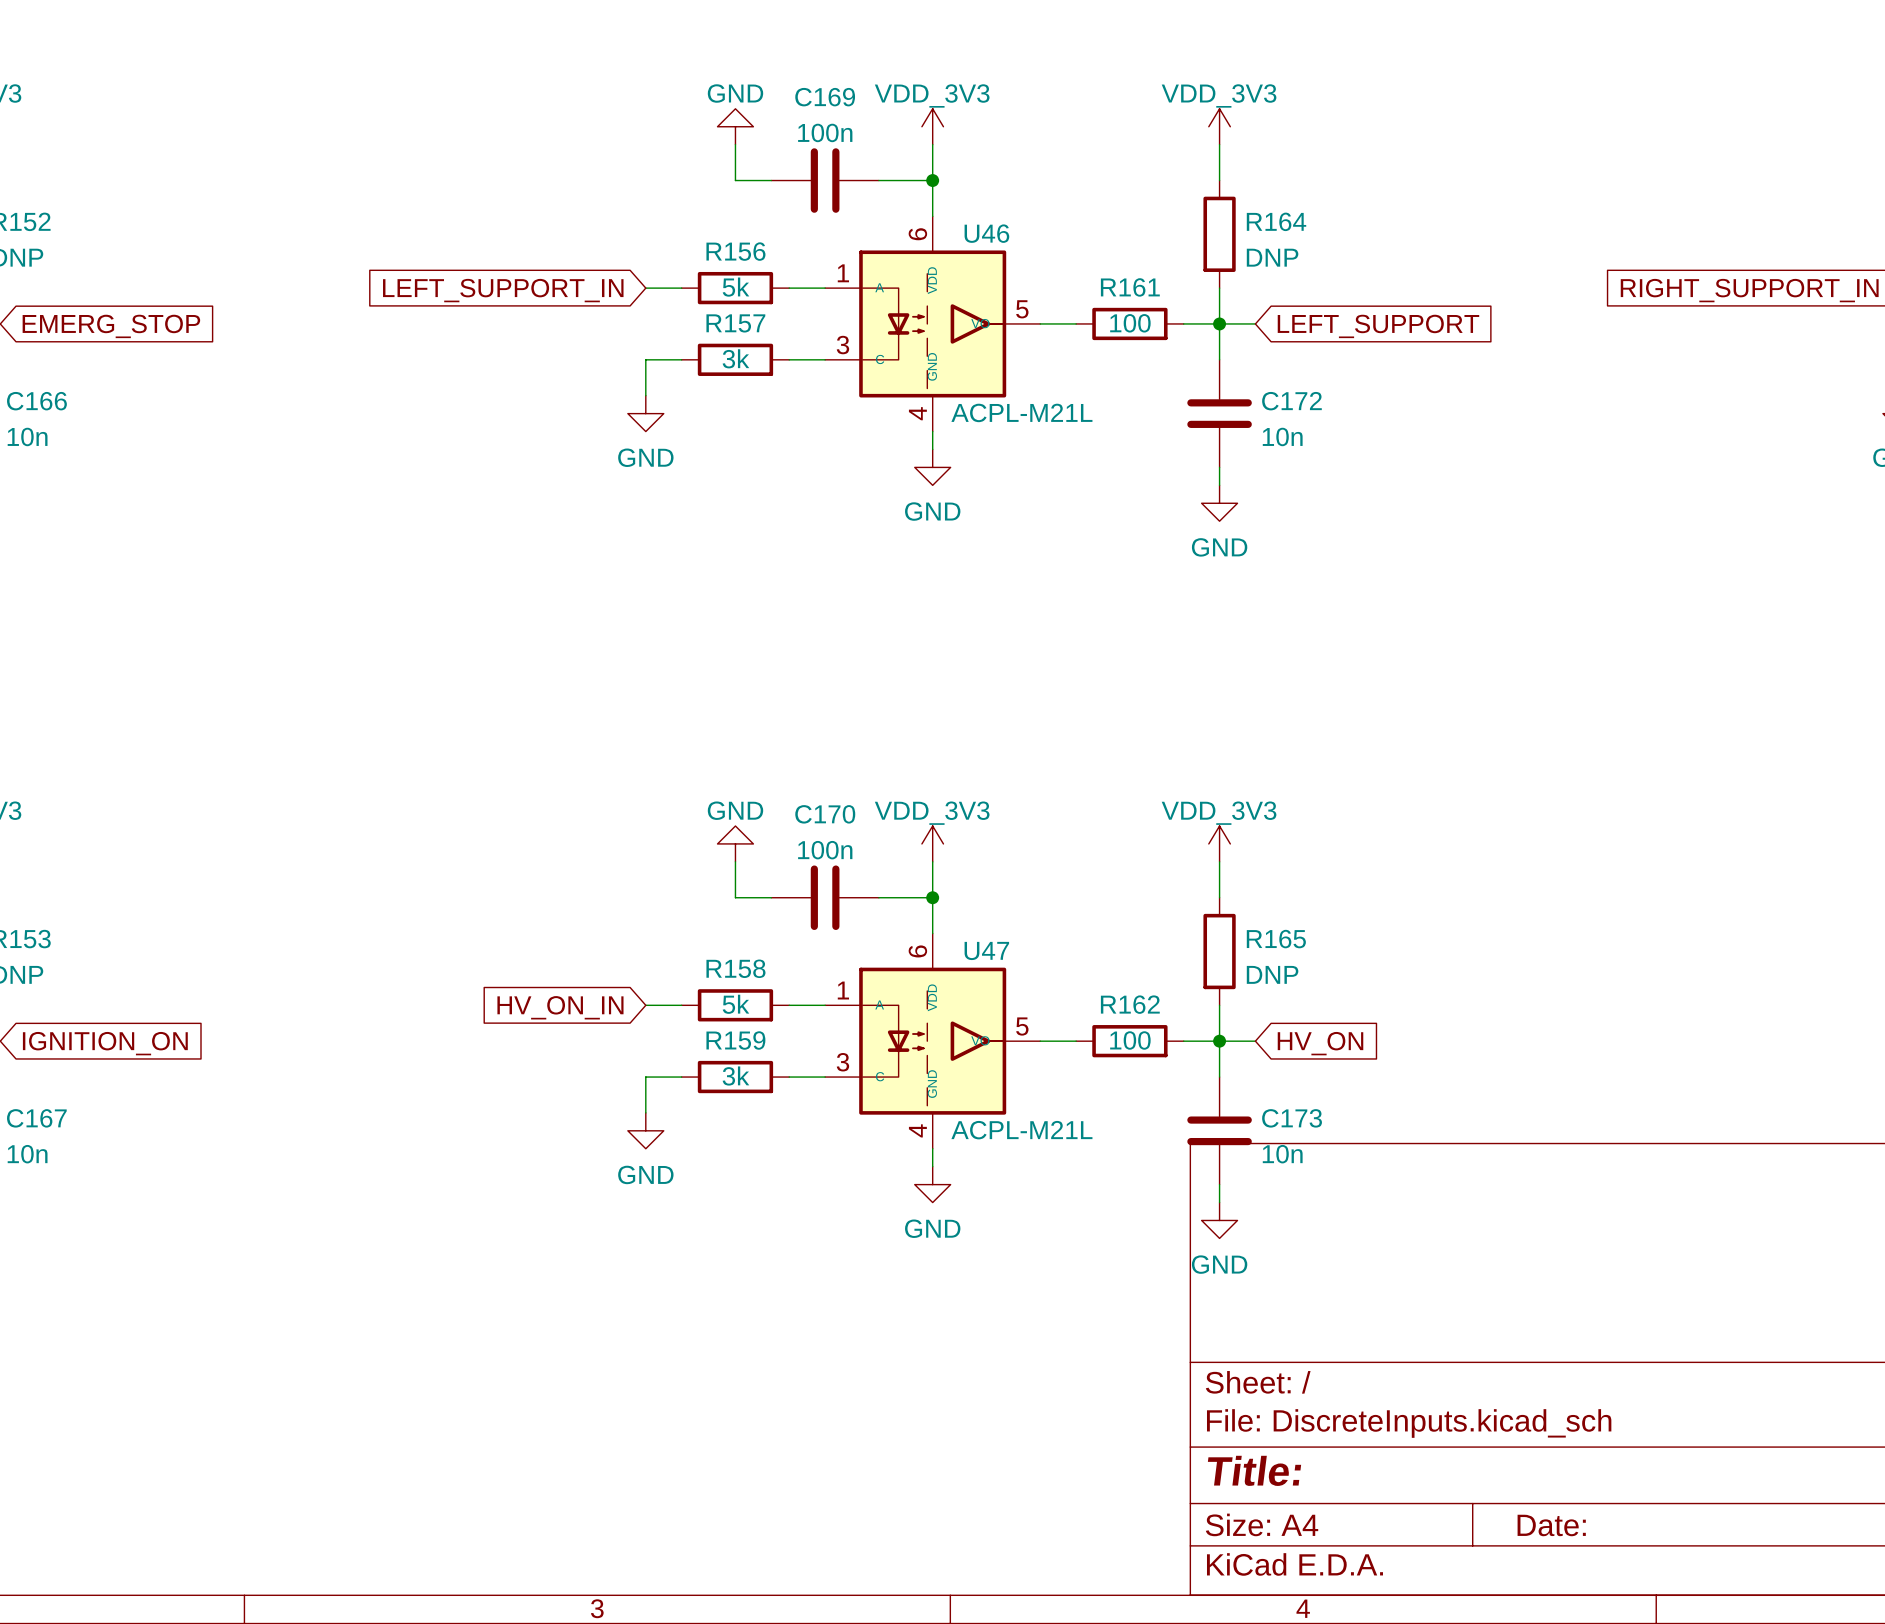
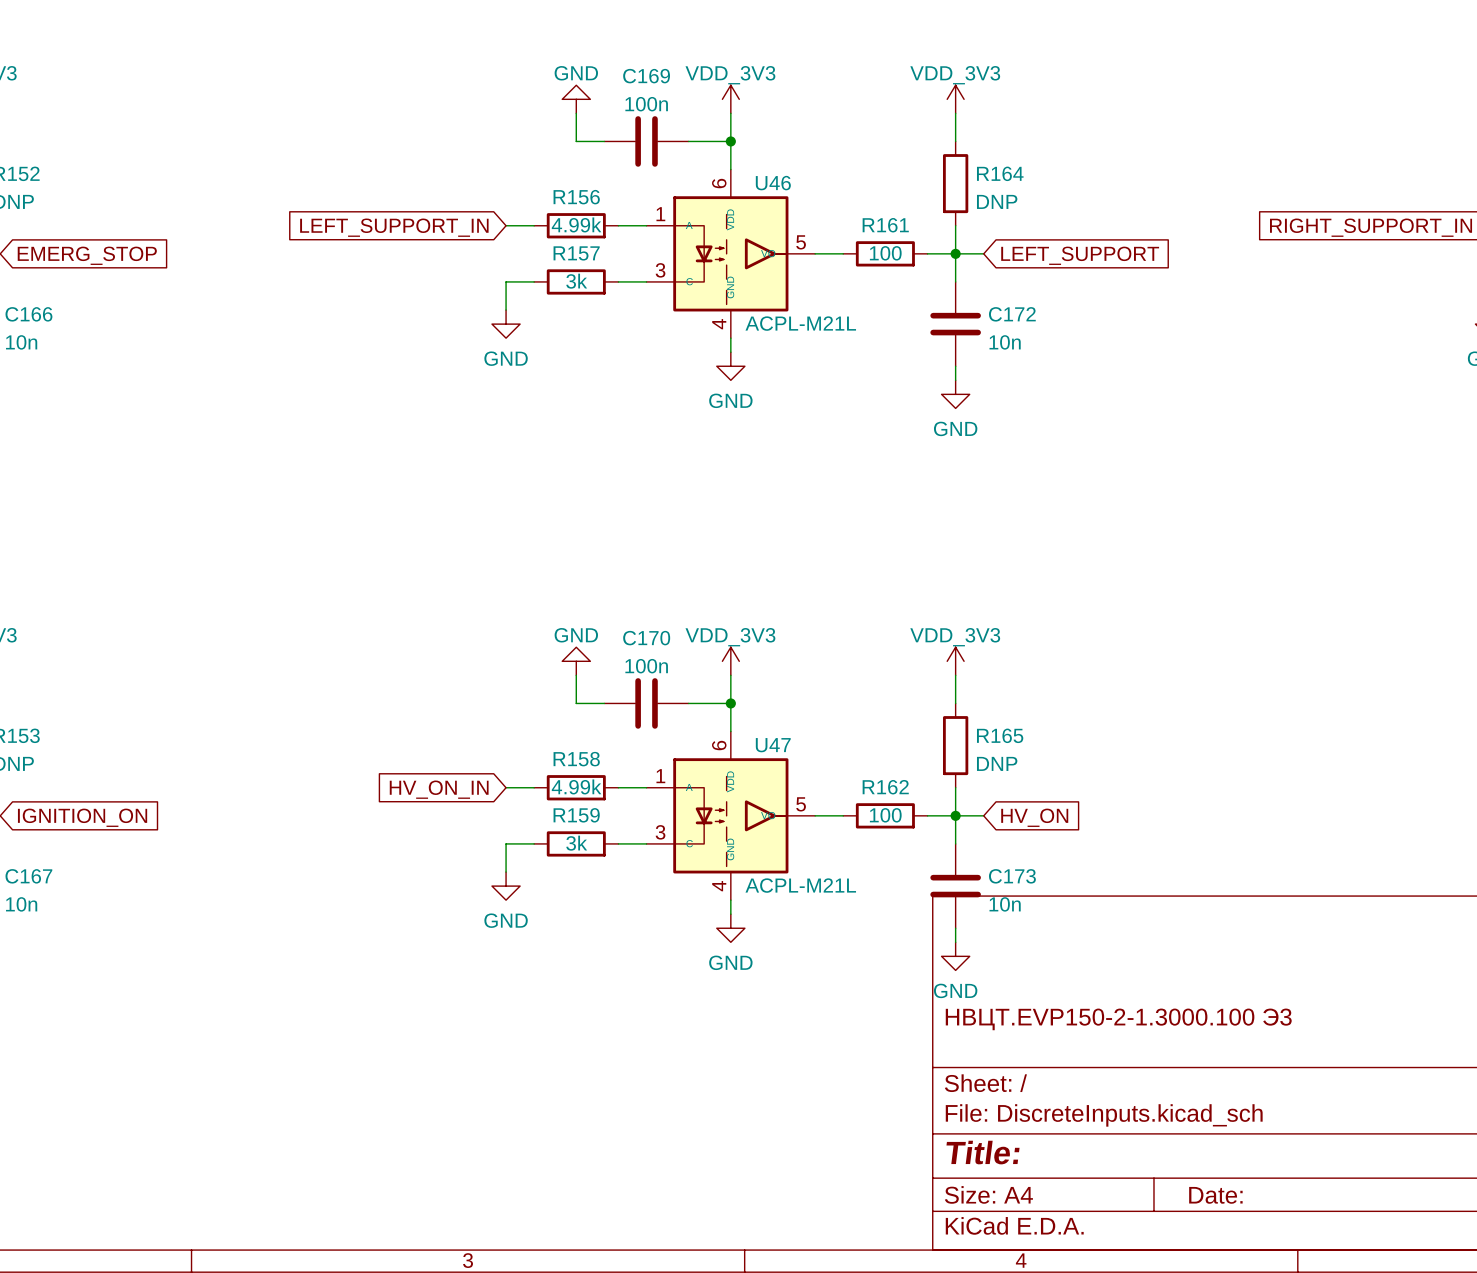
R156 value: 5k (735, 287) -> 4.99k (576, 224)
R158 value: 5k (735, 1004) -> 4.99k (576, 786)
title block: none -> НВЦТ.EVP150-2-1.3000.100 Э3 (1118, 1019)

